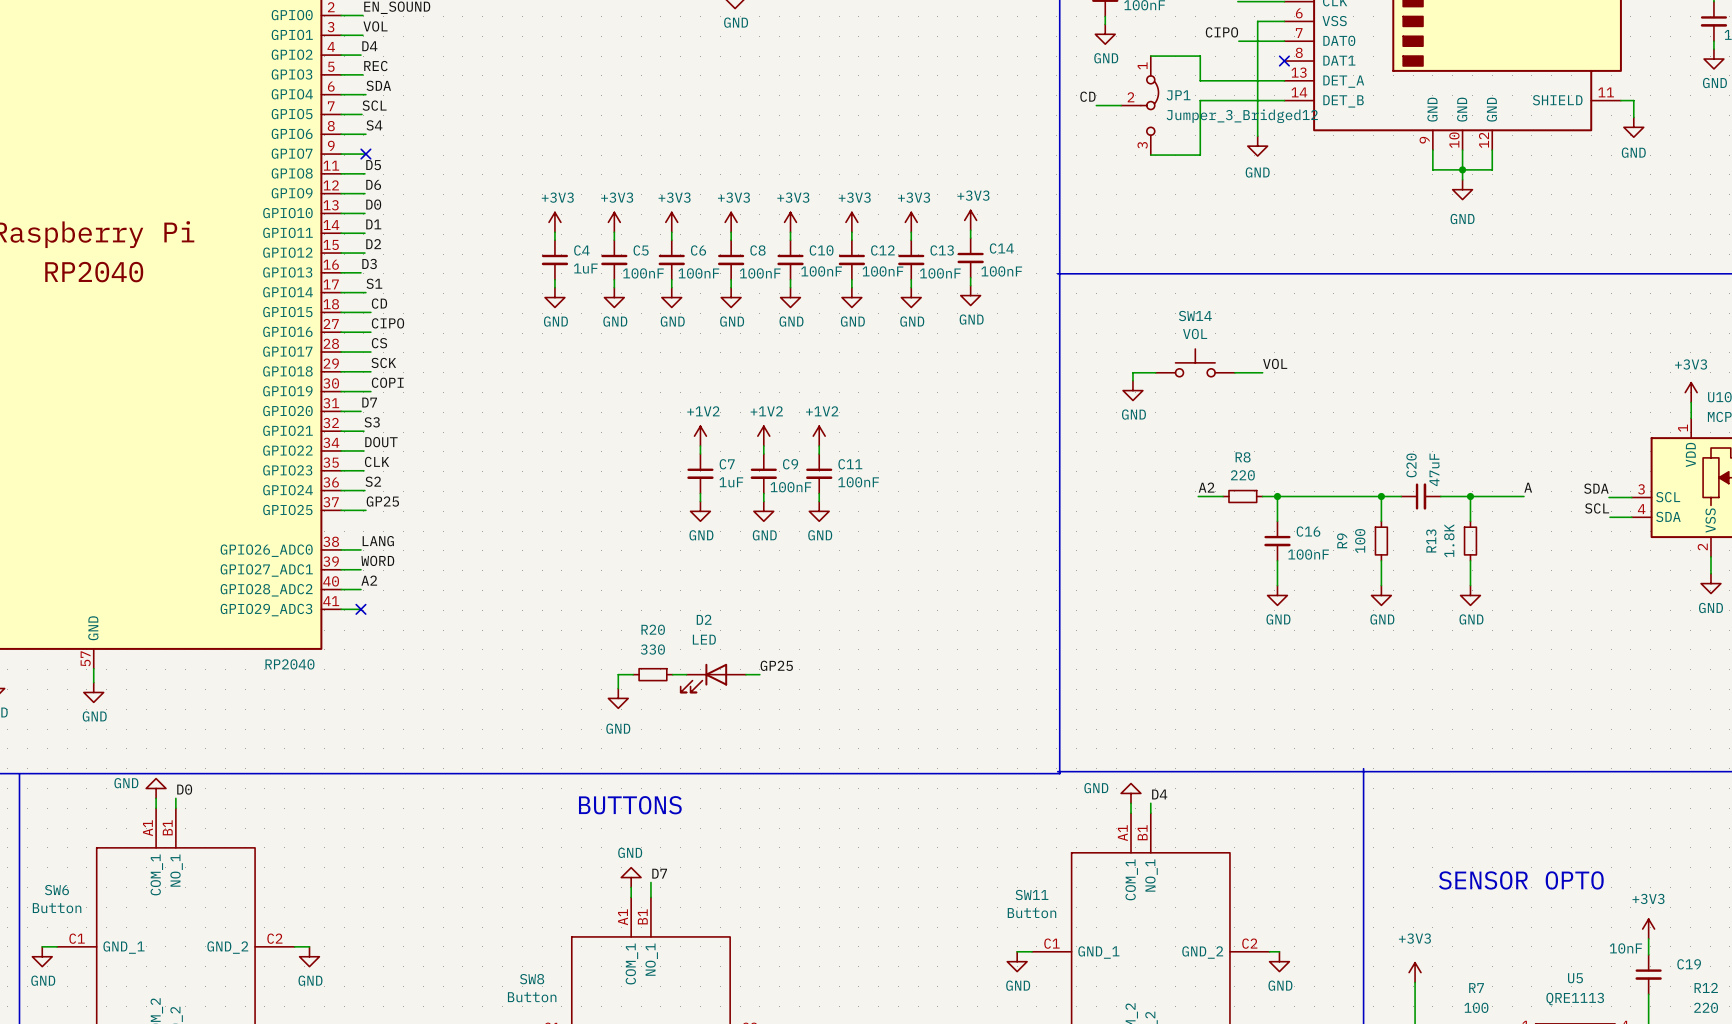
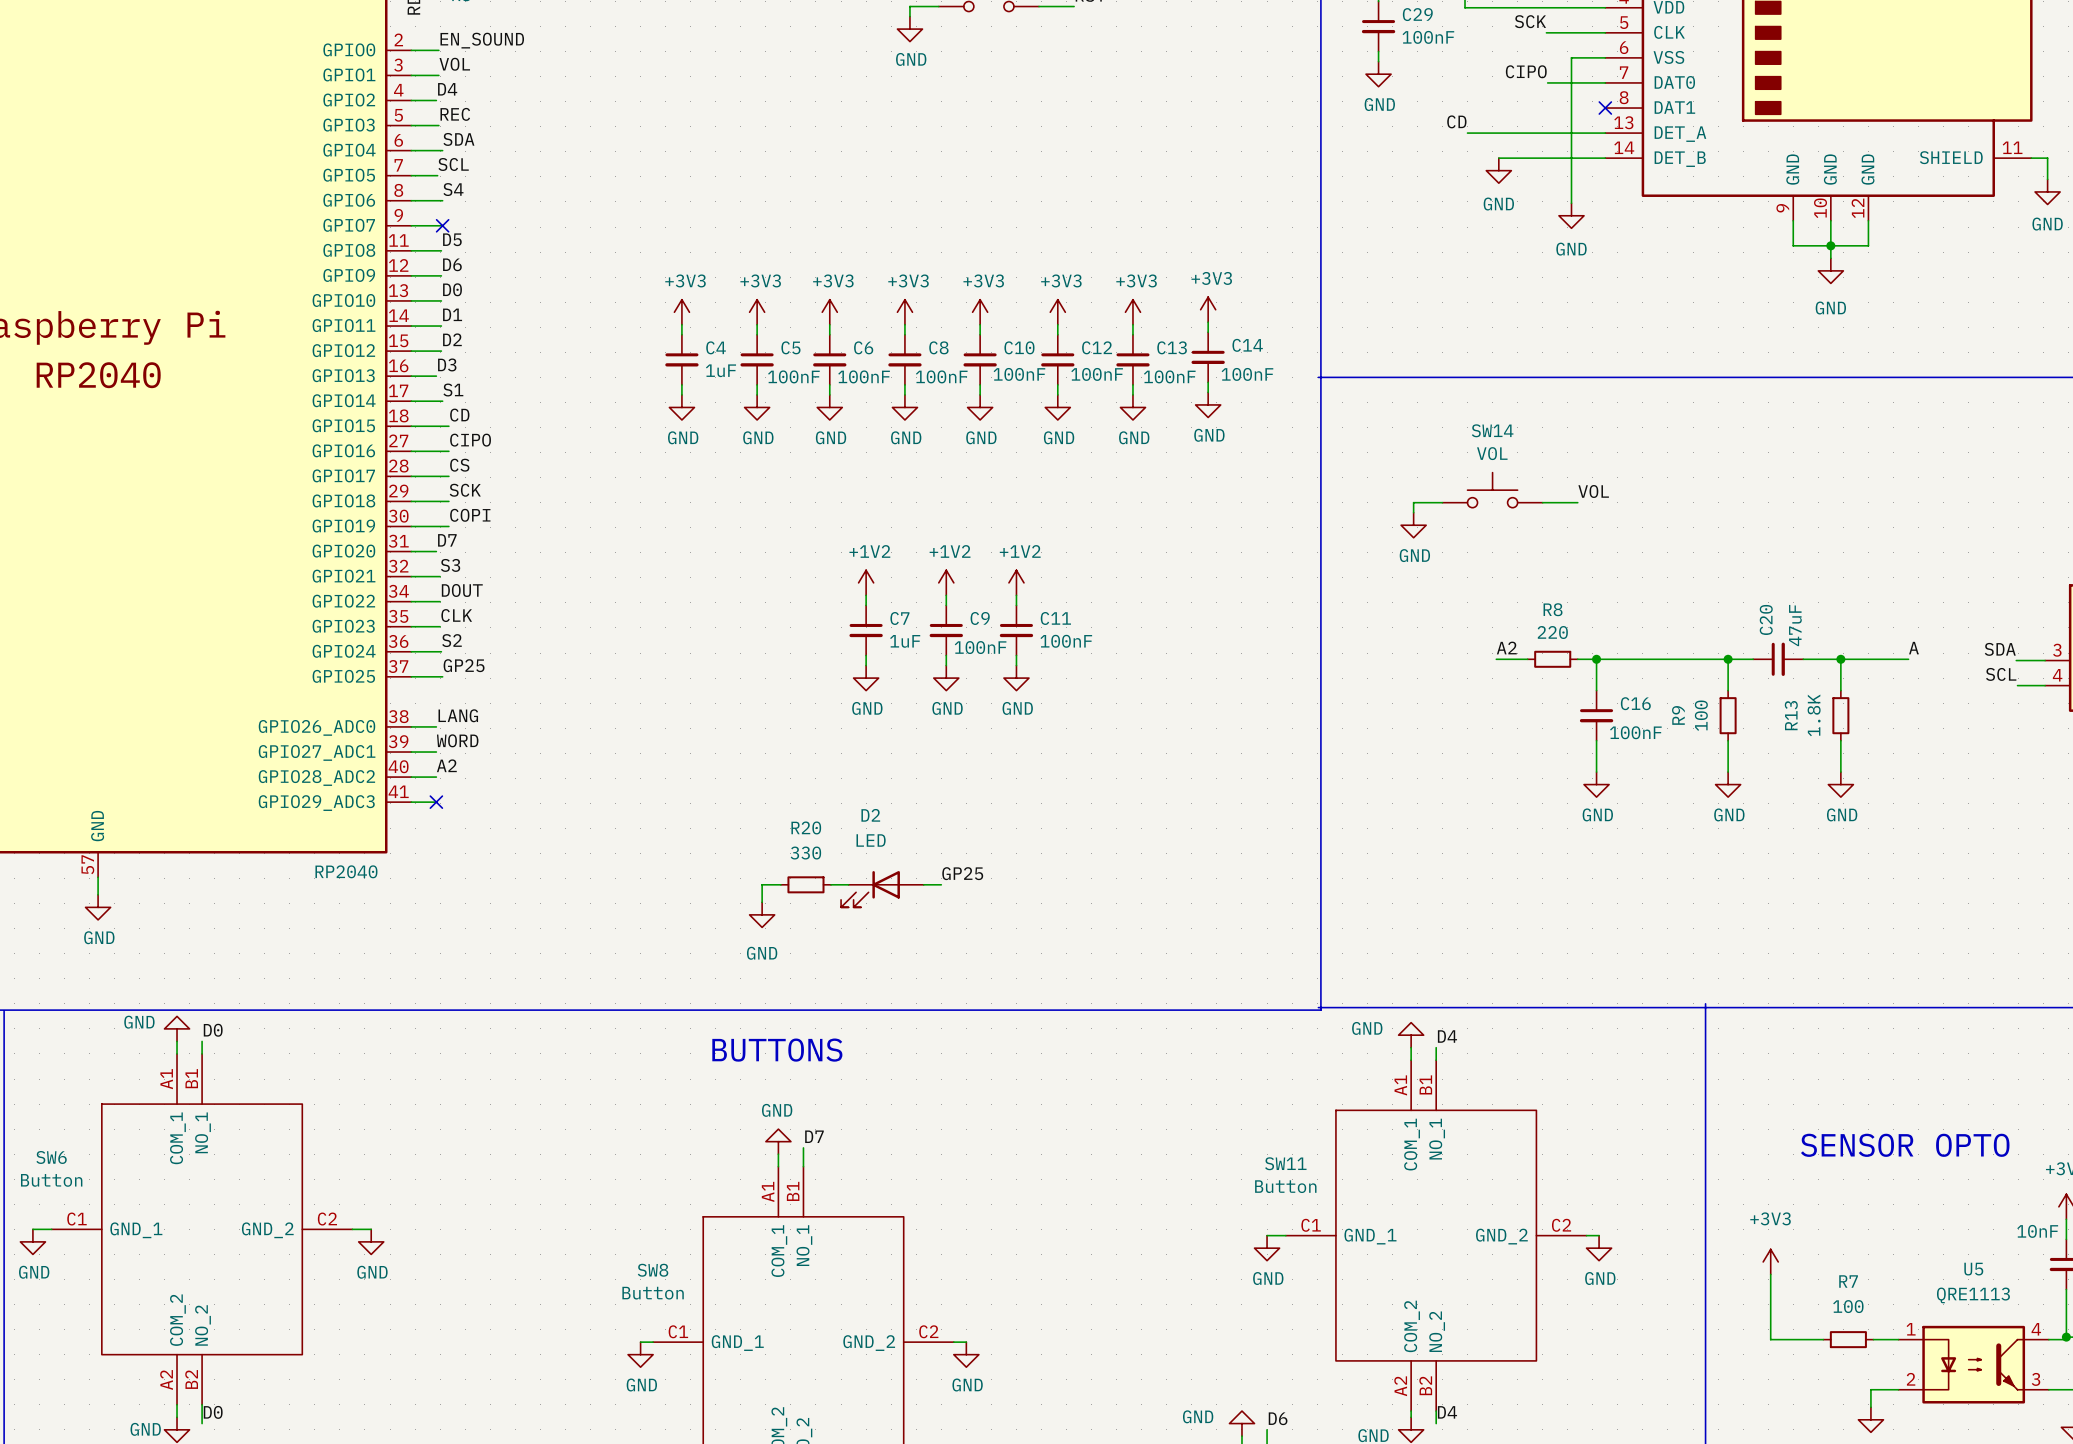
wire: (1150, 56) (1200, 56) (1200, 80) -> (1467, 133) (1498, 133)
label position: CD (1087, 96) -> CD (1456, 121)
wire: (1200, 100) (1200, 155) (1150, 155) -> none
wire: (1096, 105) (1121, 105) -> none
JP1: Jumper_3_Bridged12 (1139, 105) -> none
power symbol: none -> GND (1498, 170)

